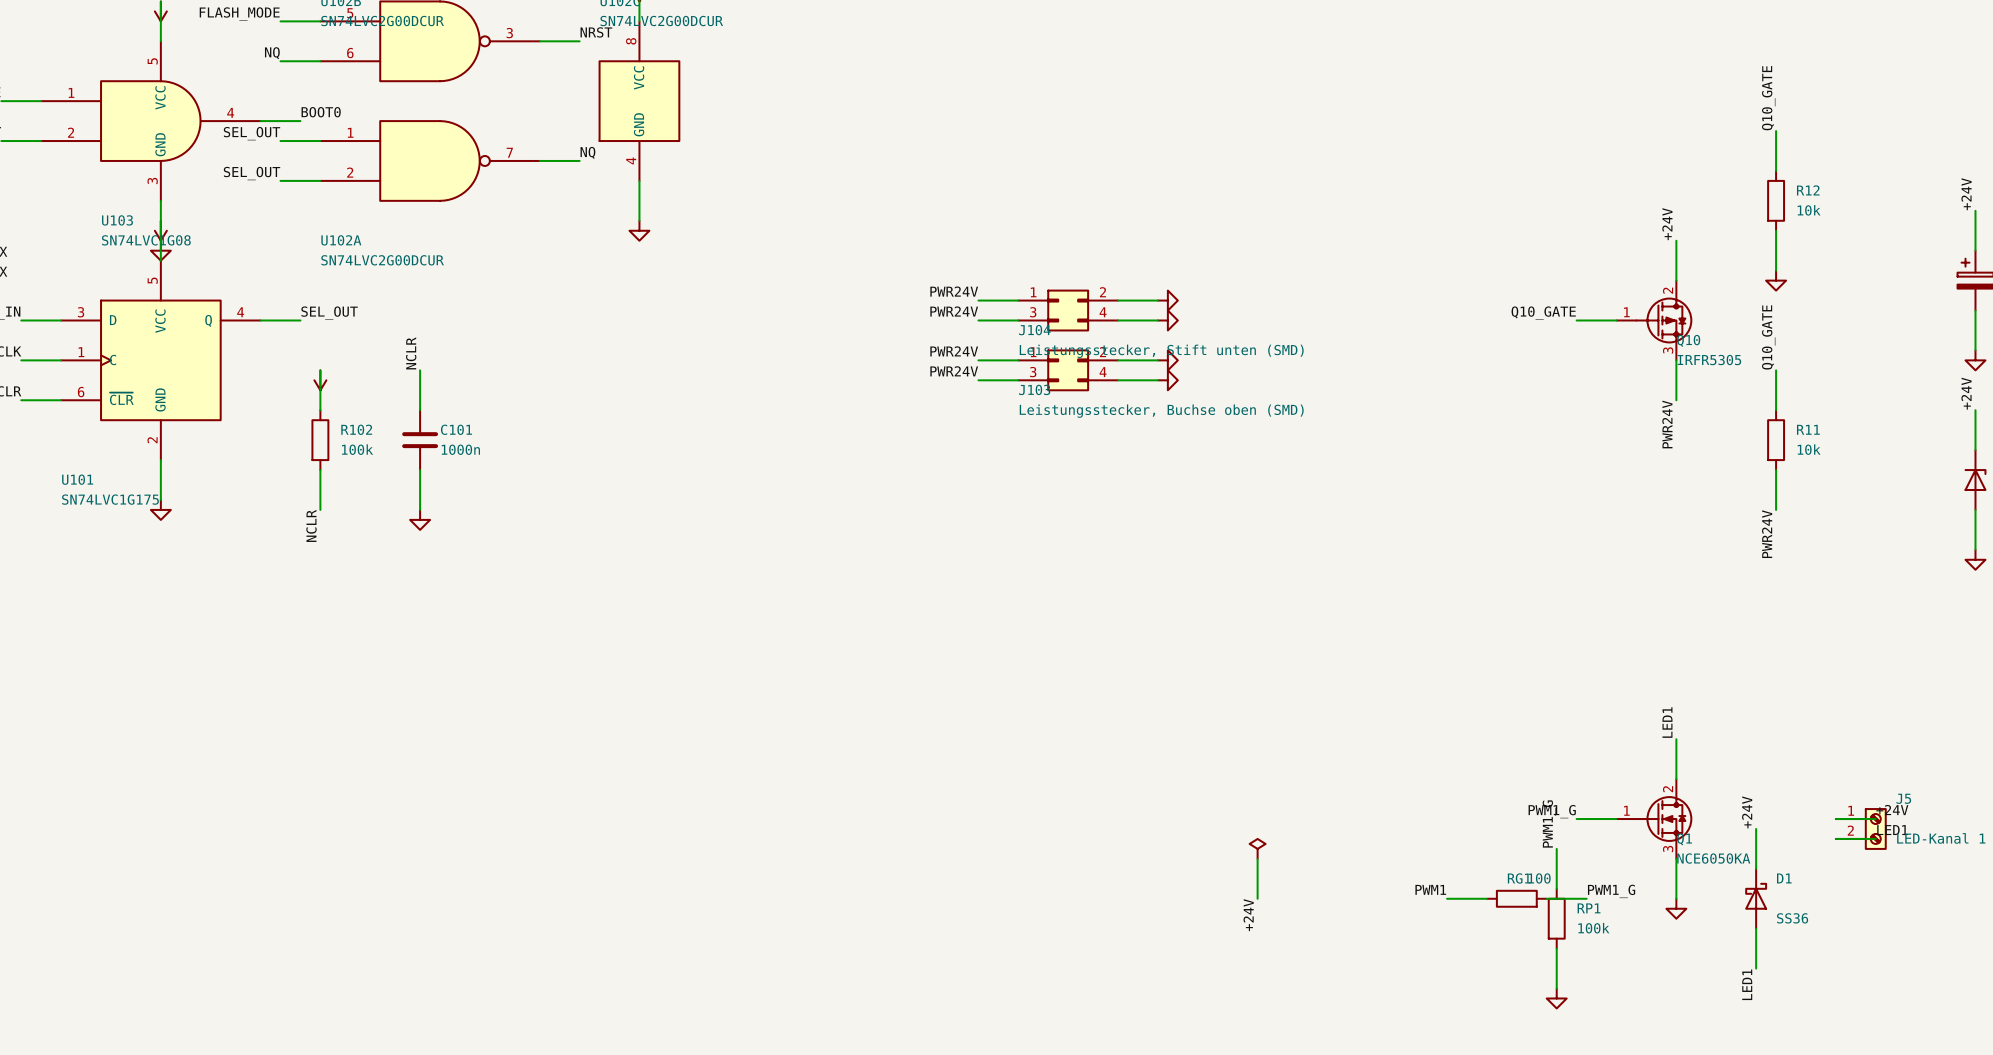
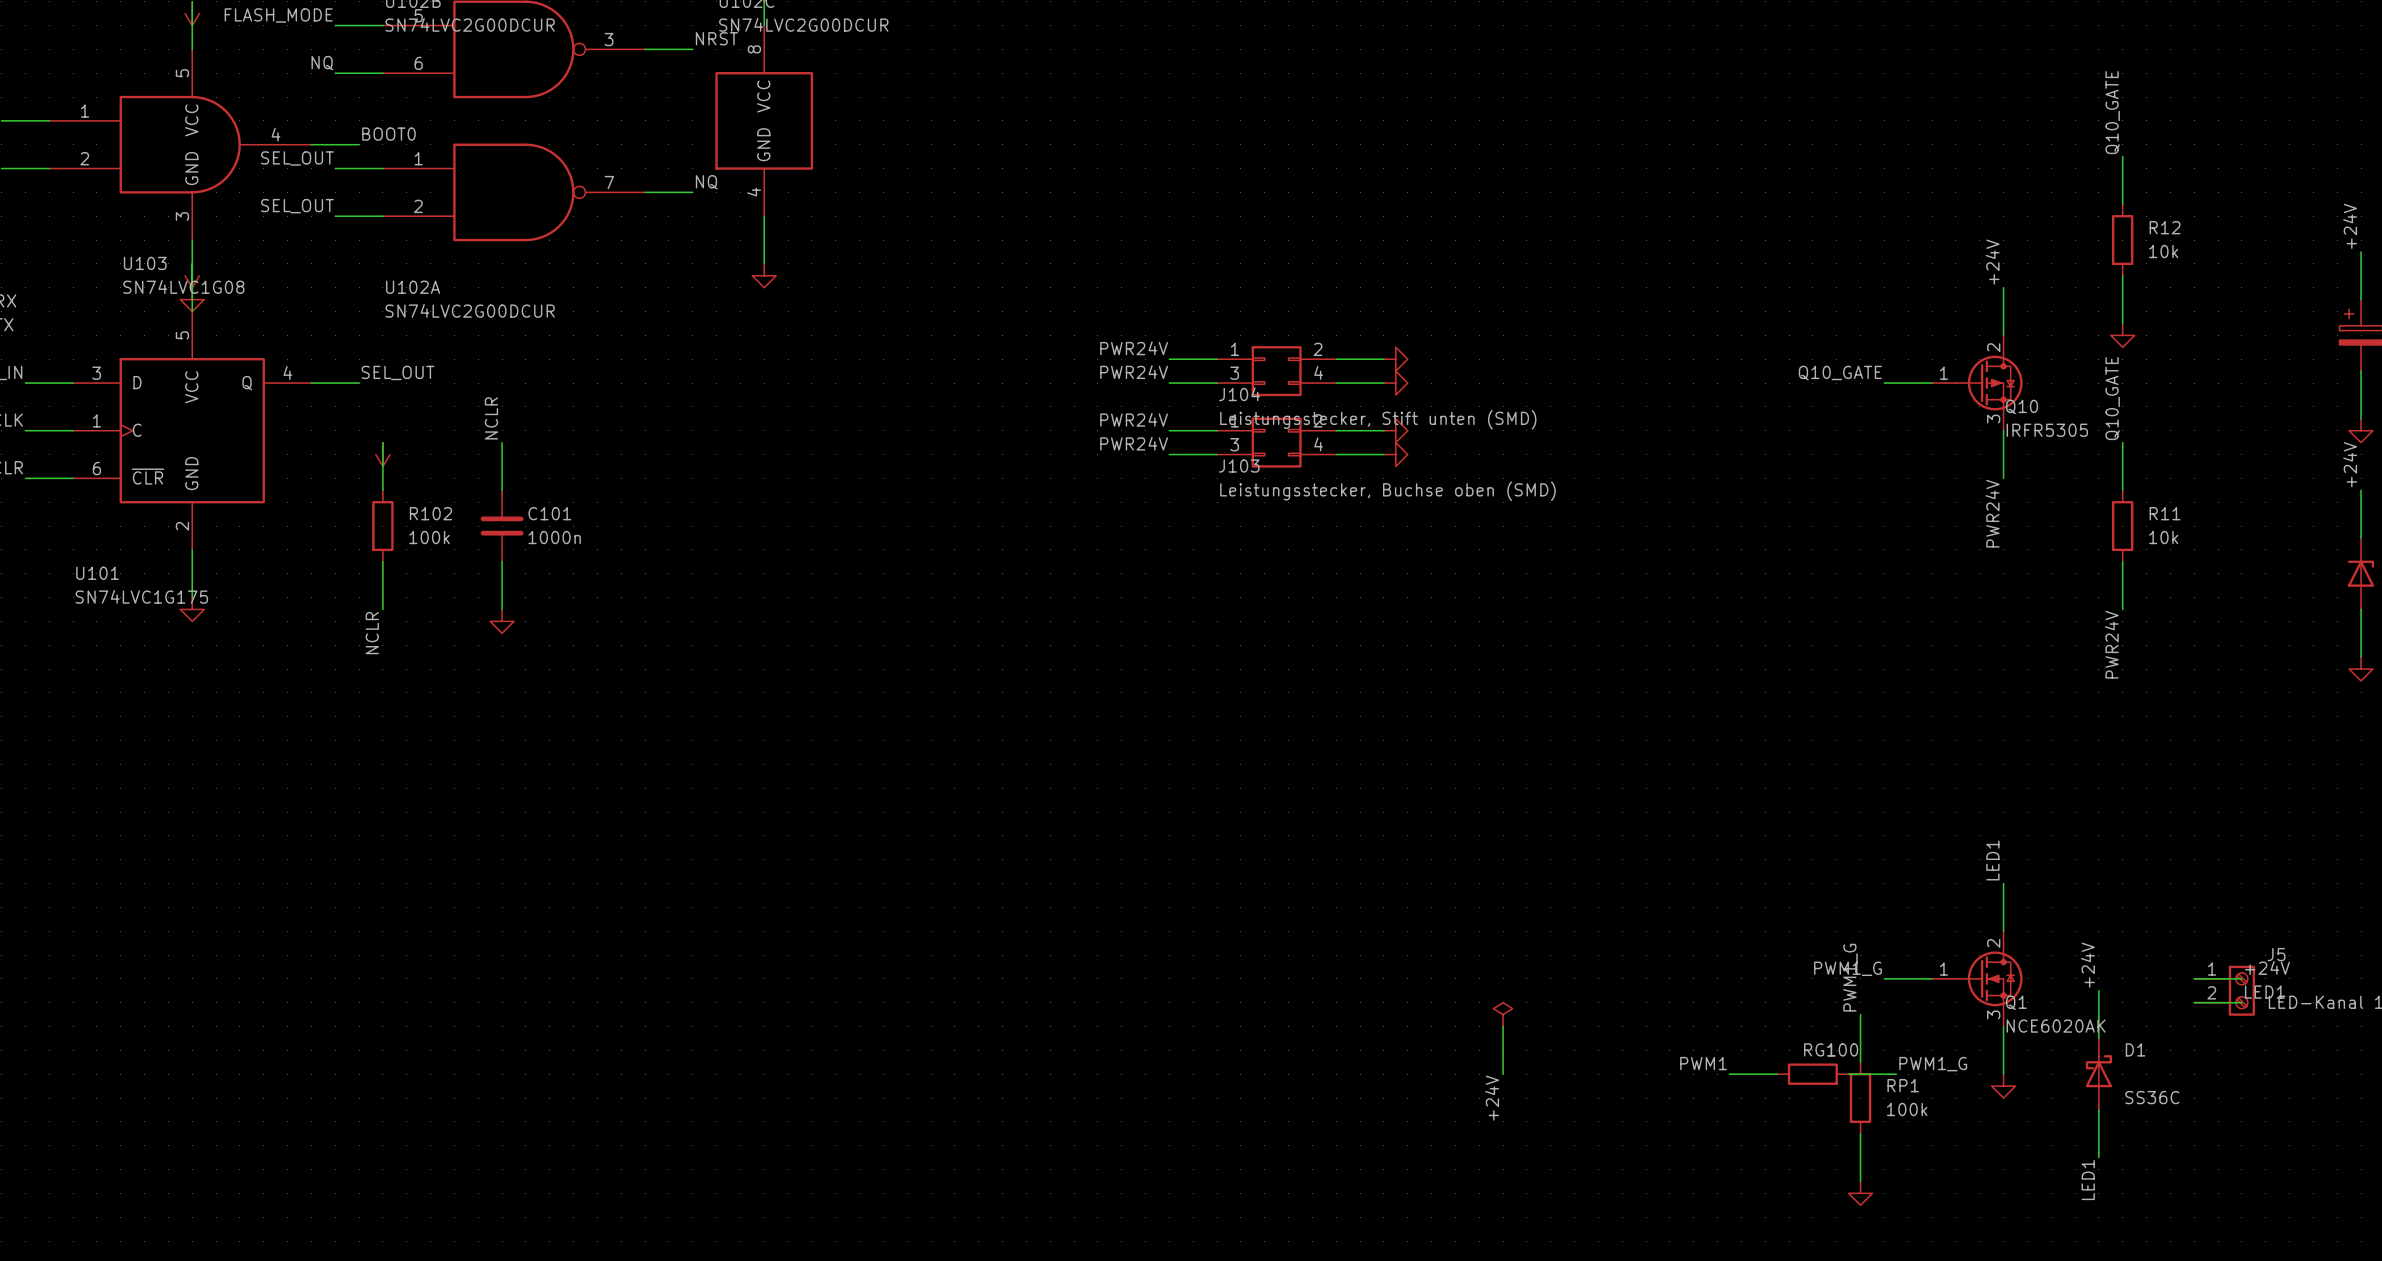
Q1 value: NCE6050KA (1713, 858) -> NCE6020AK (2056, 1026)
D1 value: SS36 (1792, 918) -> SS36C (2152, 1097)

